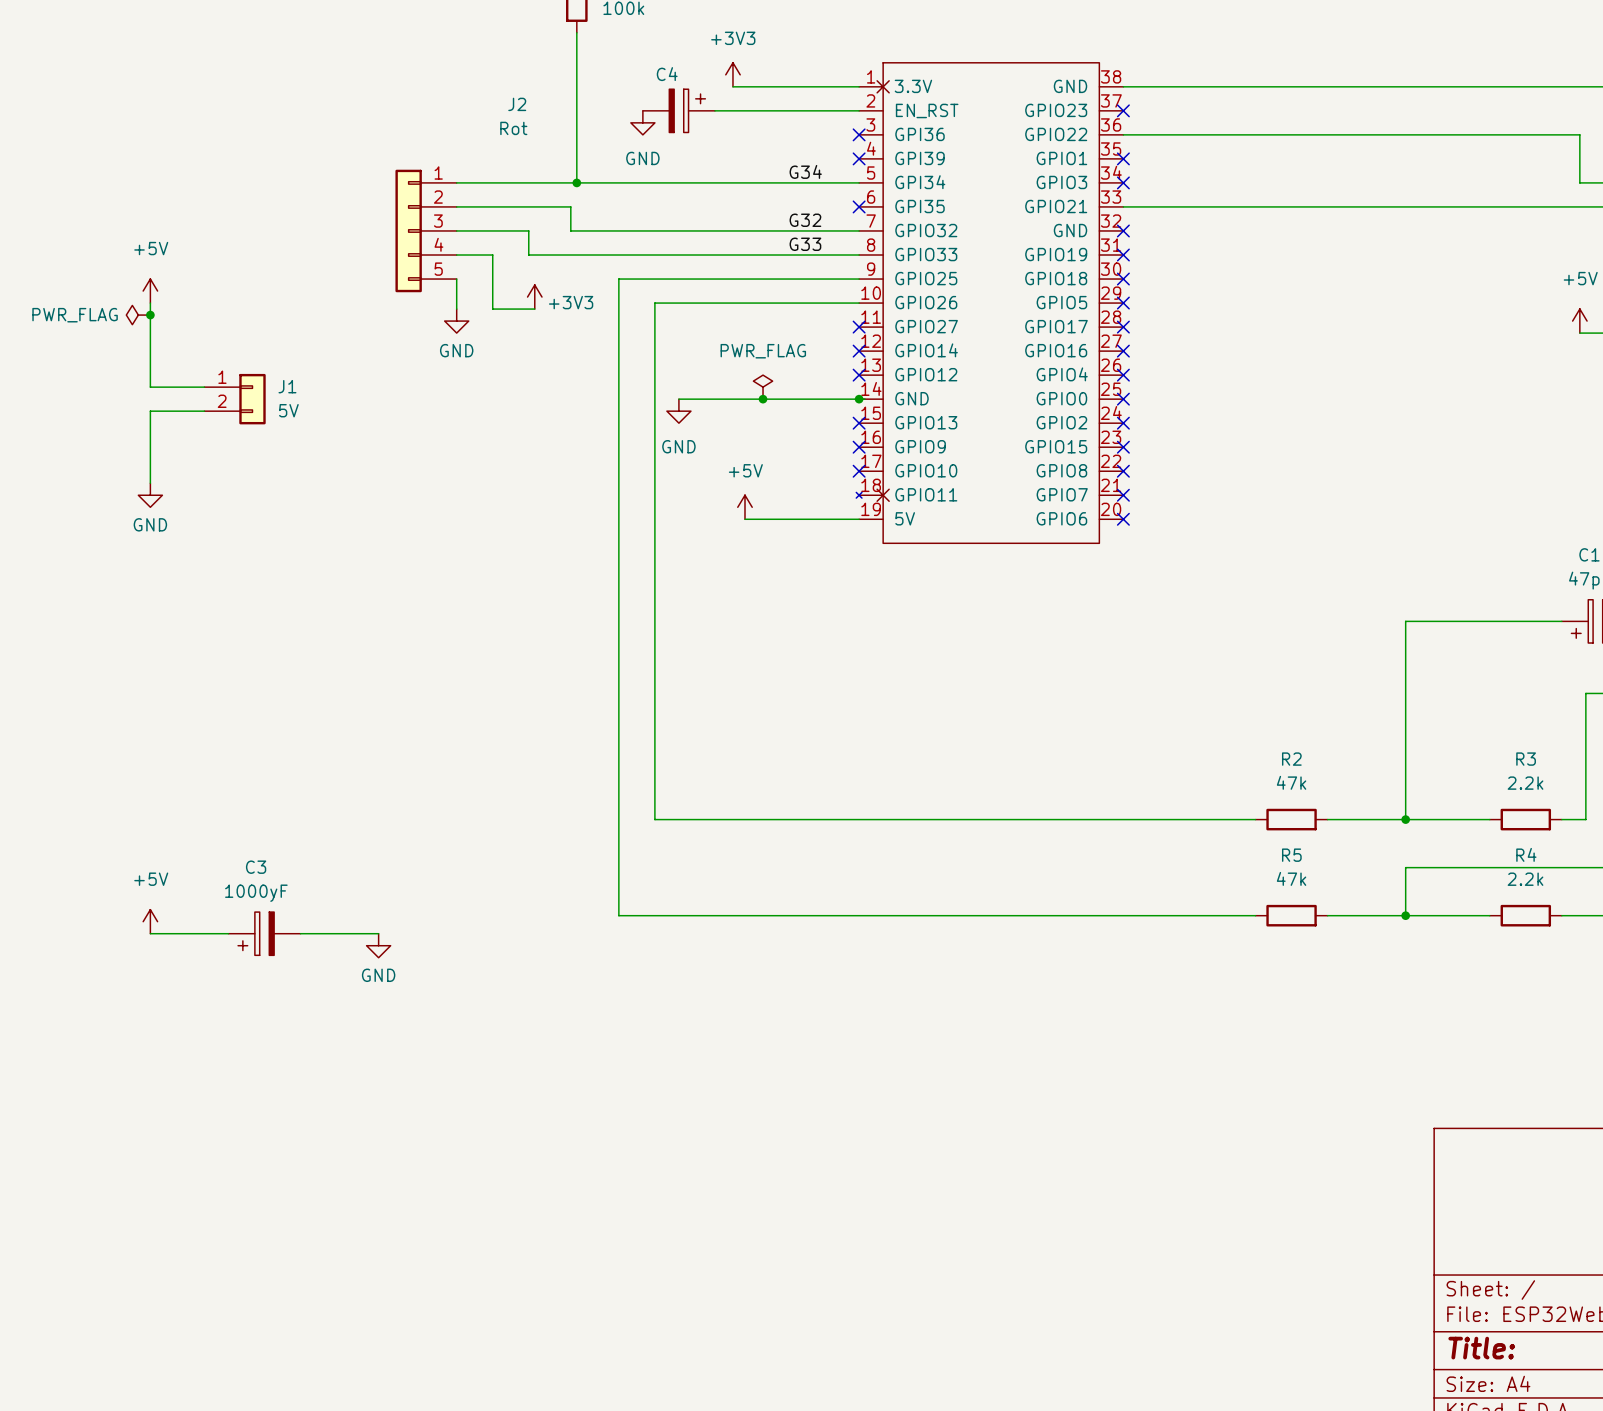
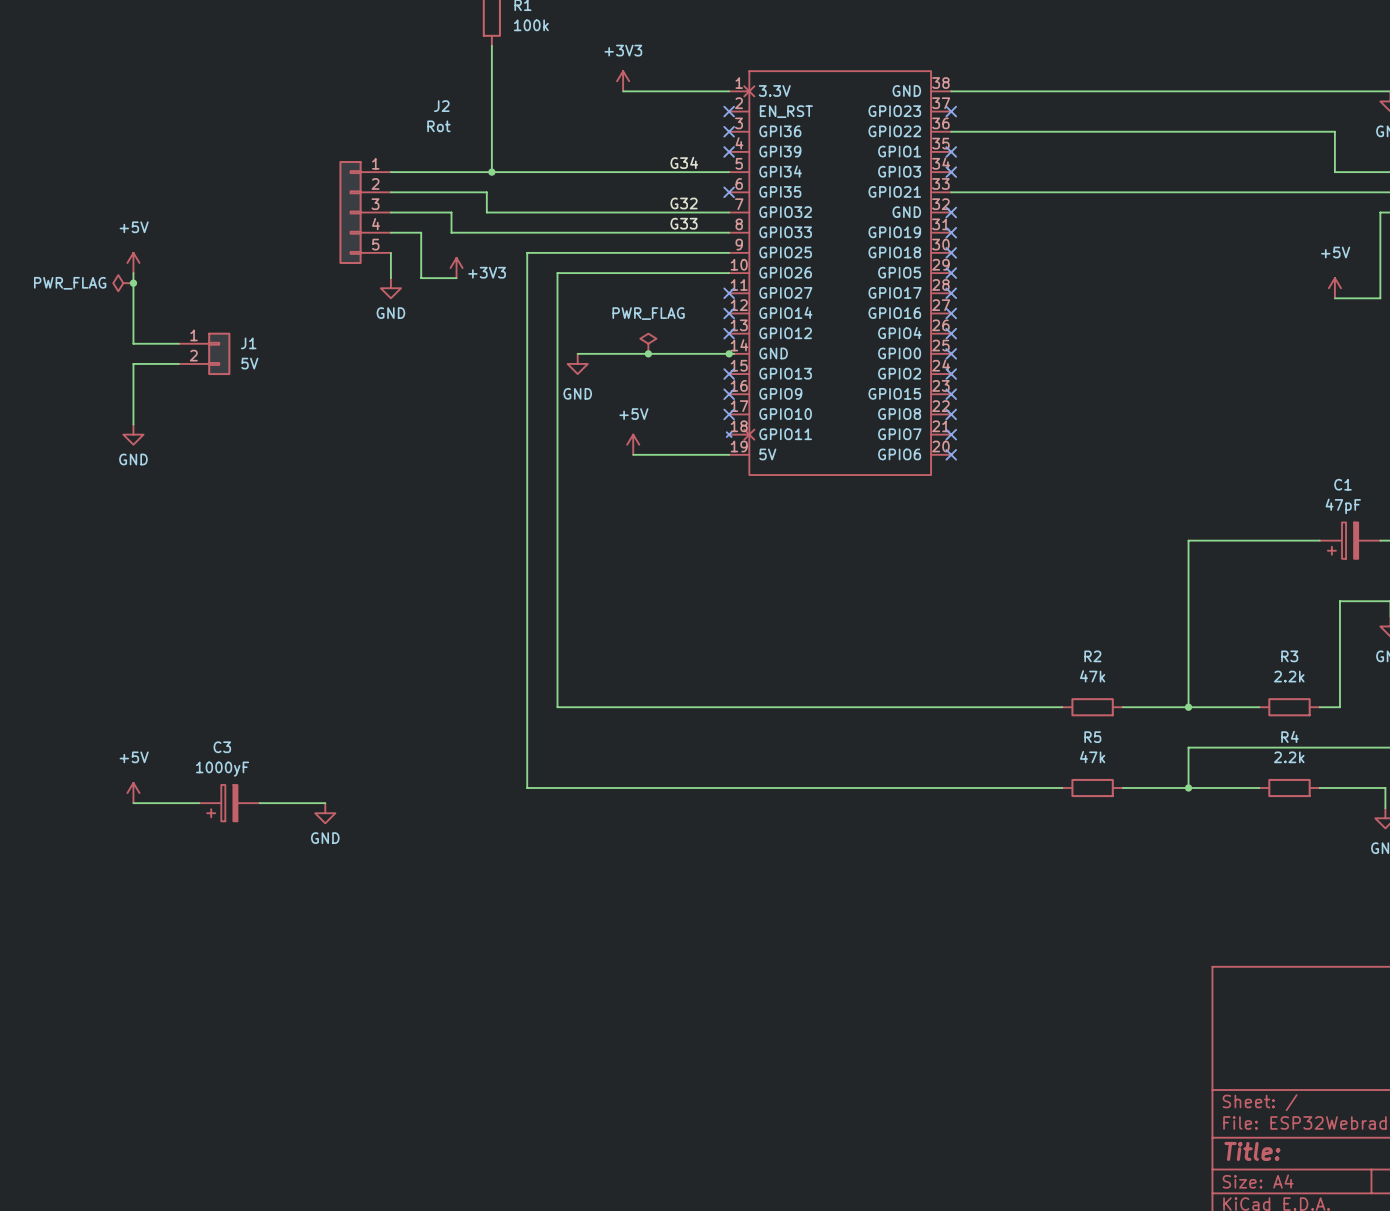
C4: (678, 110) -> none
wire: (714, 110) (859, 110) -> none
no-connect mark: none -> (729, 111)
power symbol: GND (642, 122) -> none

